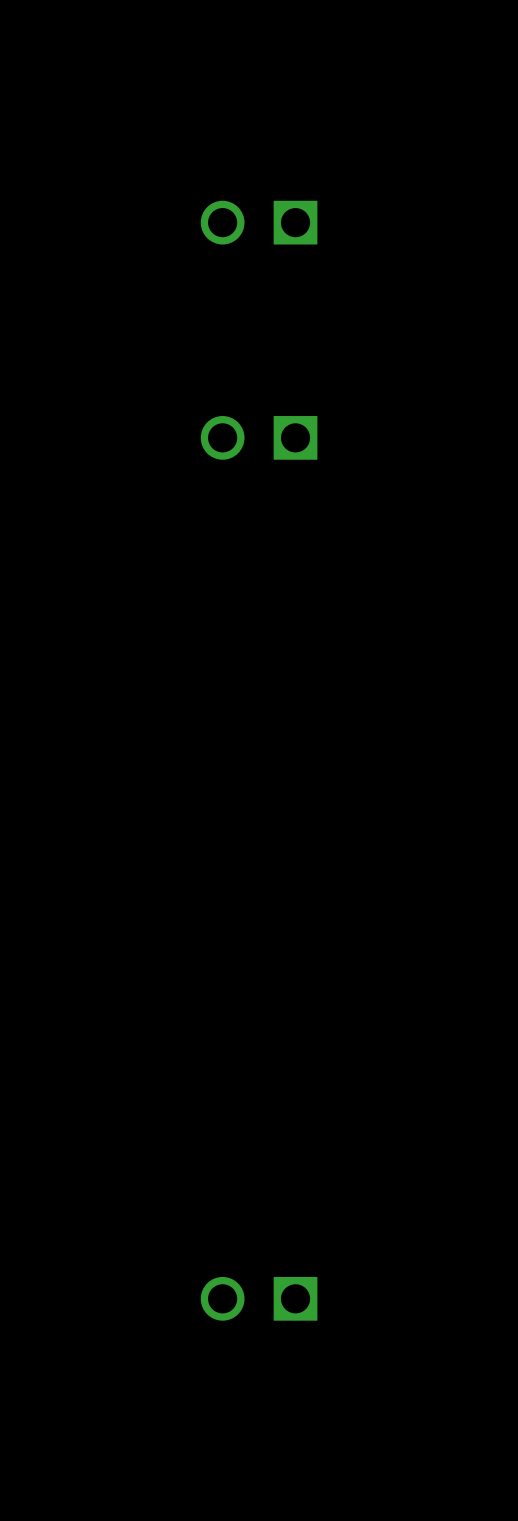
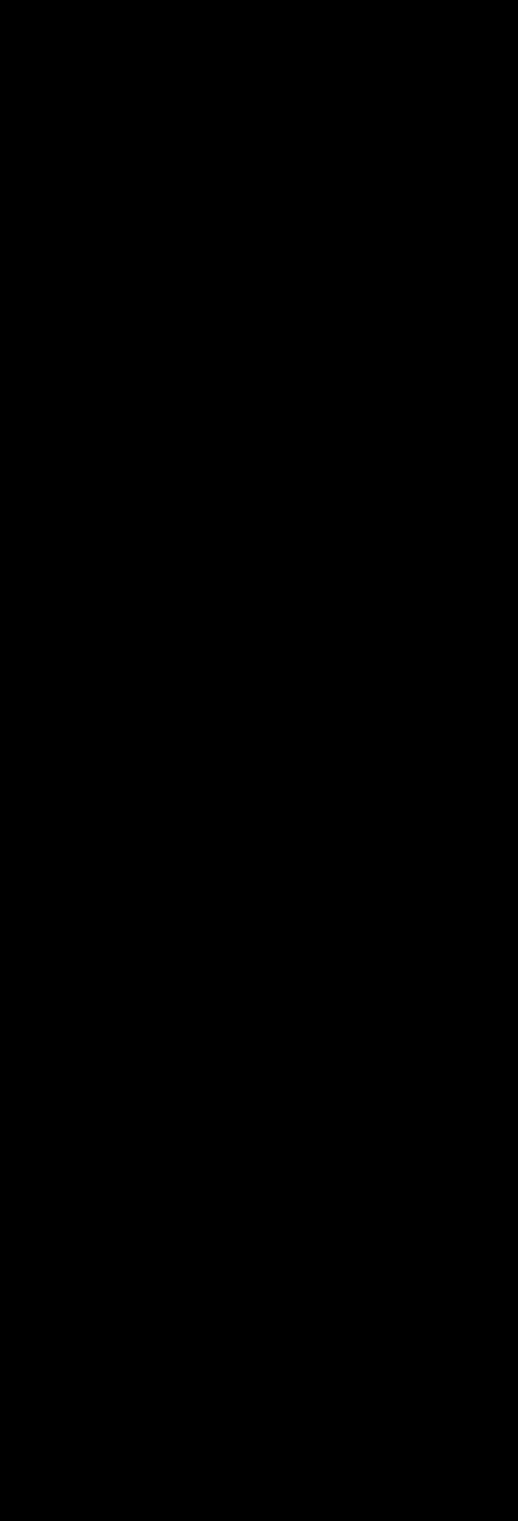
part: (259, 222) -> none
part: (259, 437) -> none
part: (259, 1298) -> none

